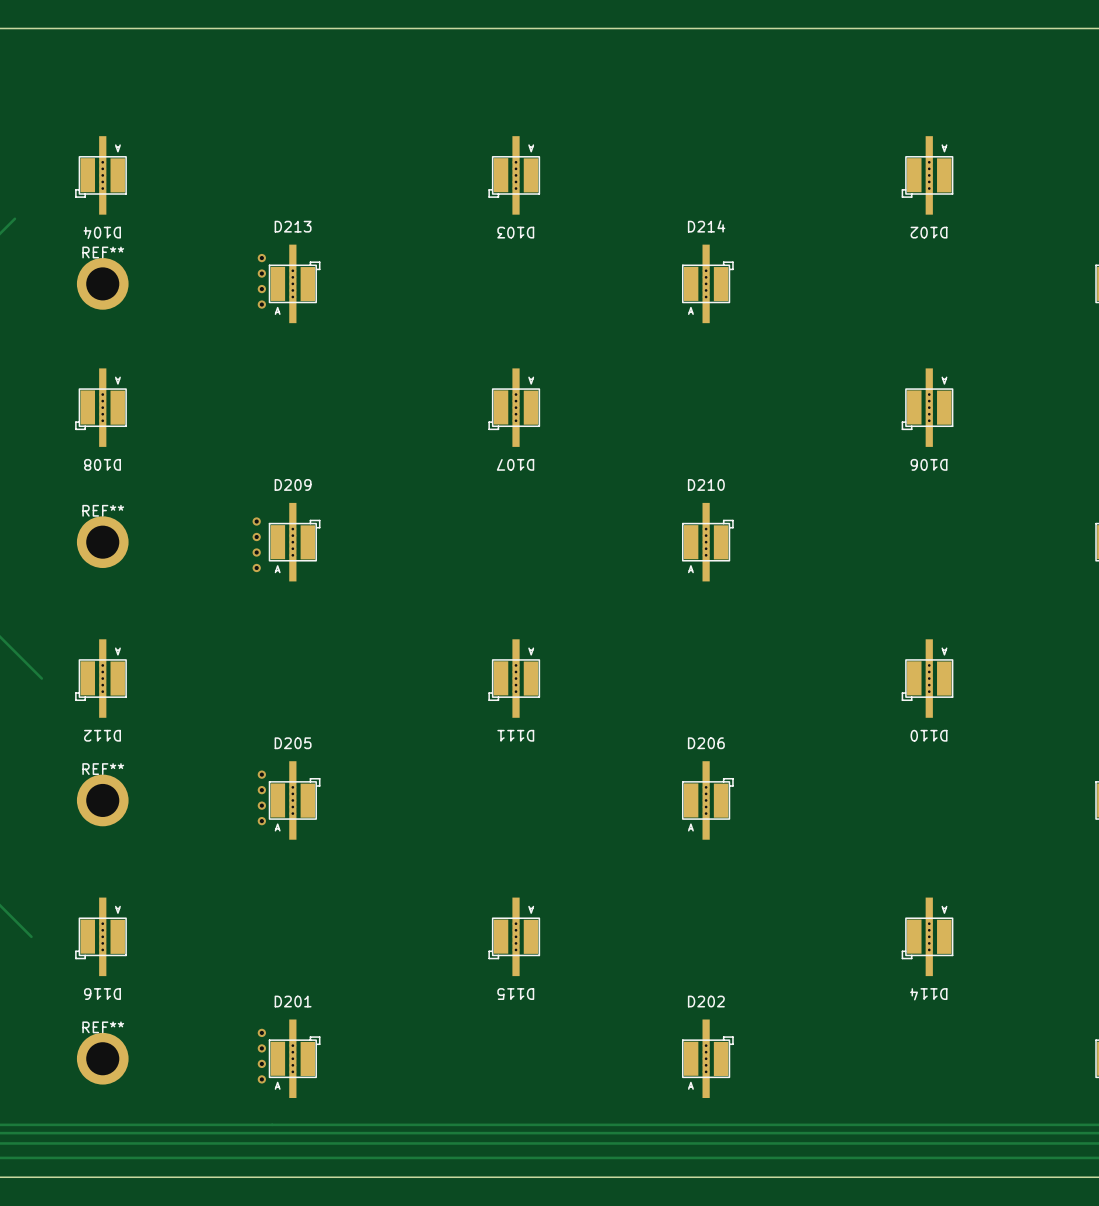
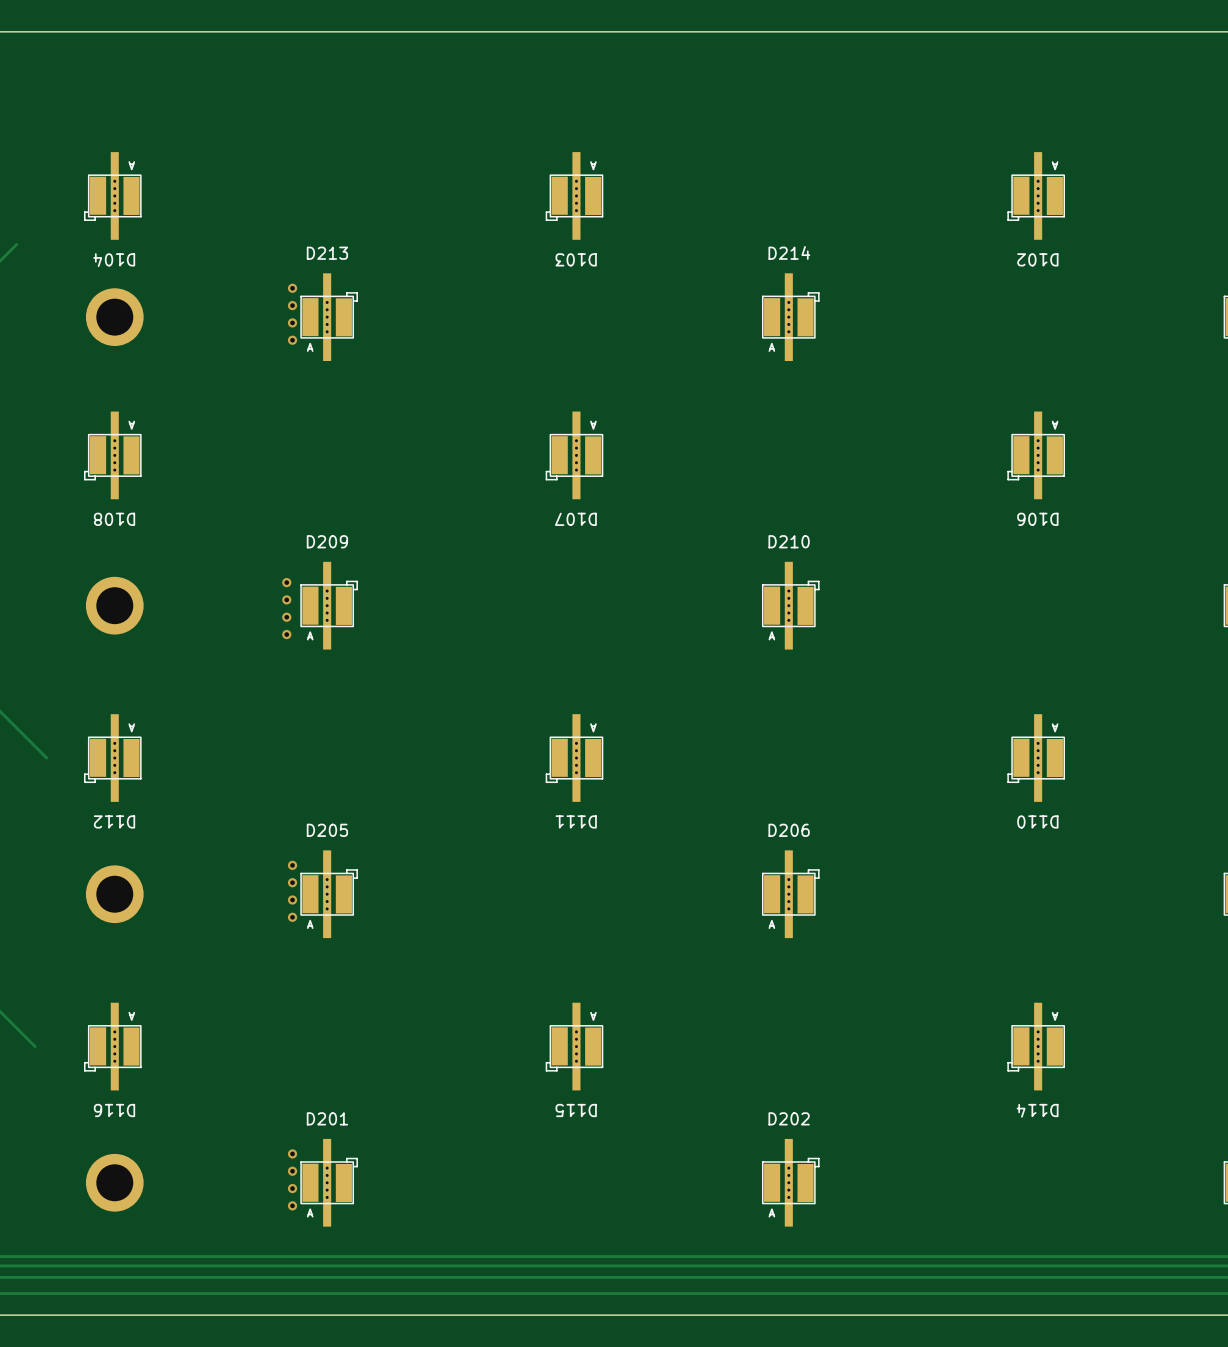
REF** name: REF** (103, 252) -> none
REF** name: REF** (103, 510) -> none
REF** name: REF** (103, 769) -> none
REF** name: REF** (103, 1027) -> none

